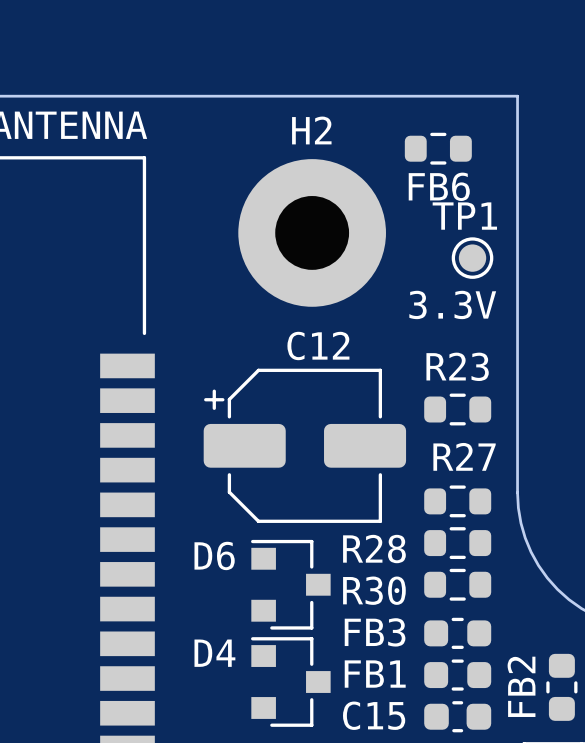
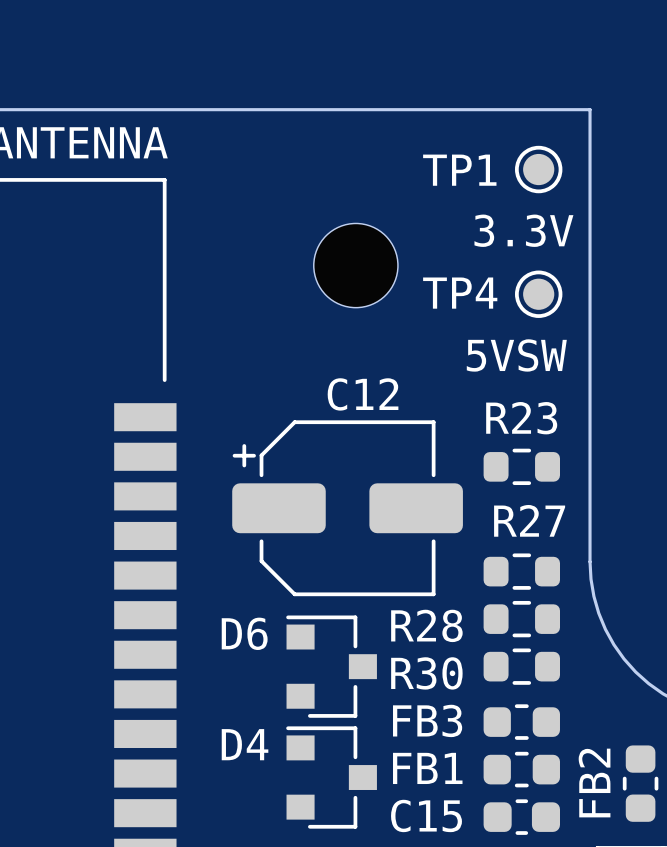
FB6: (438, 148) -> none
TP1: none -> (538, 169)
TP1 name: TP1 (464, 216) -> TP4 (460, 293)
H2: (312, 232) -> none
part: none -> (355, 265)
text position: 3.3V (452, 304) -> 3.3V (523, 230)
text: none -> 5VSW (516, 355)

